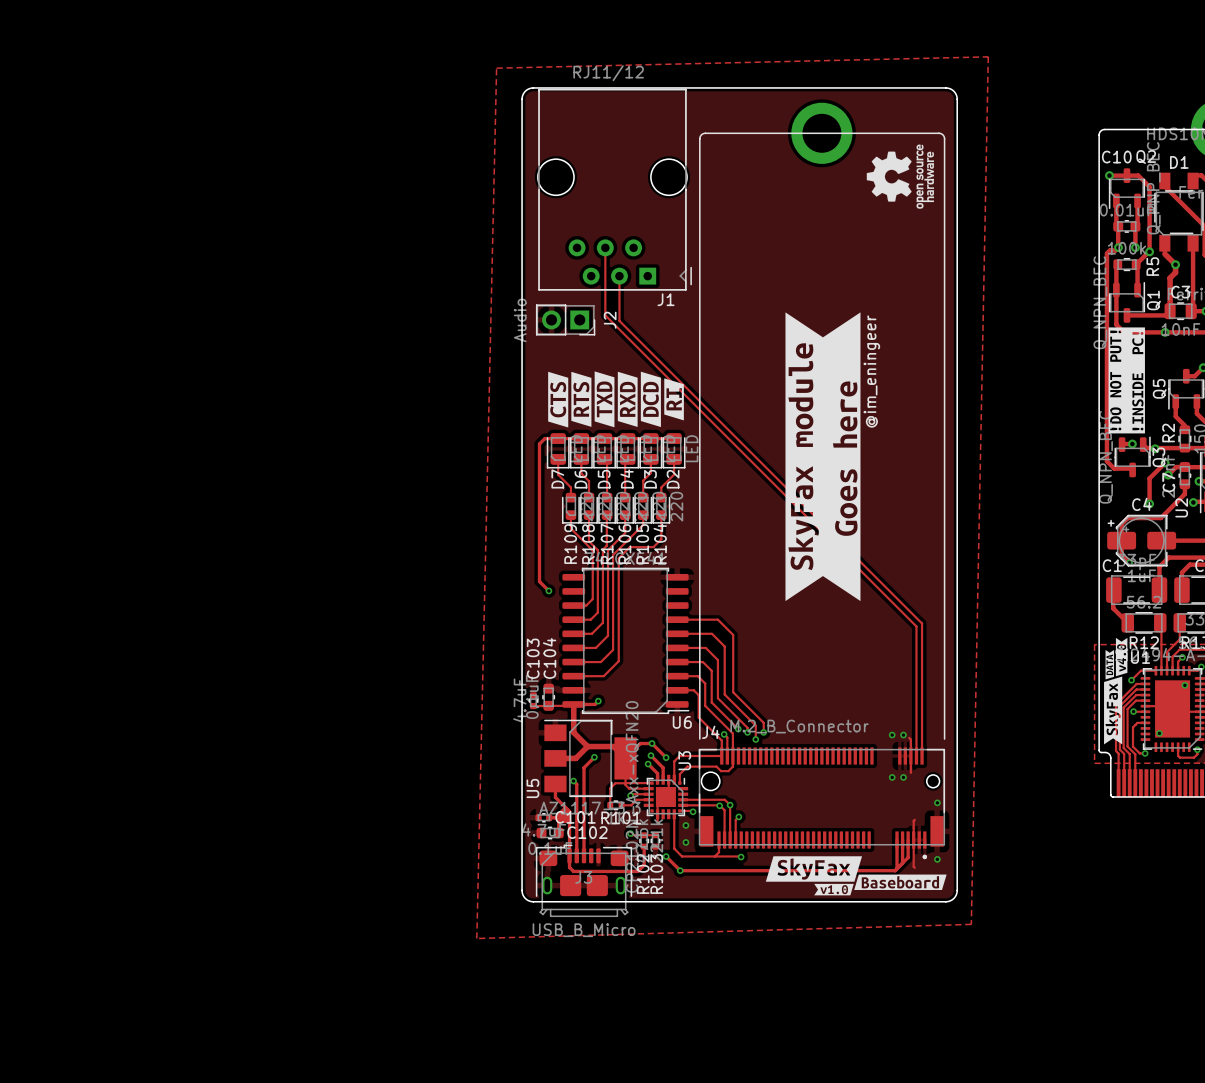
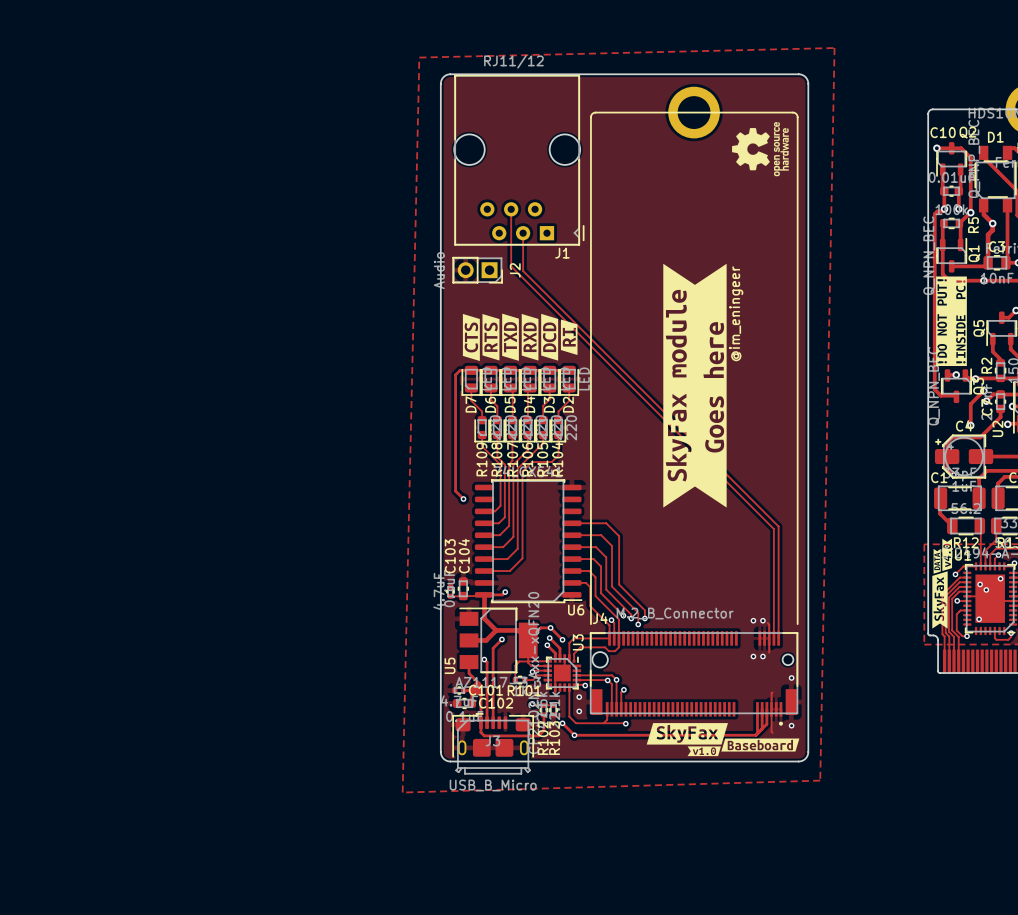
via: none -> (980, 584)
via: none -> (986, 589)

